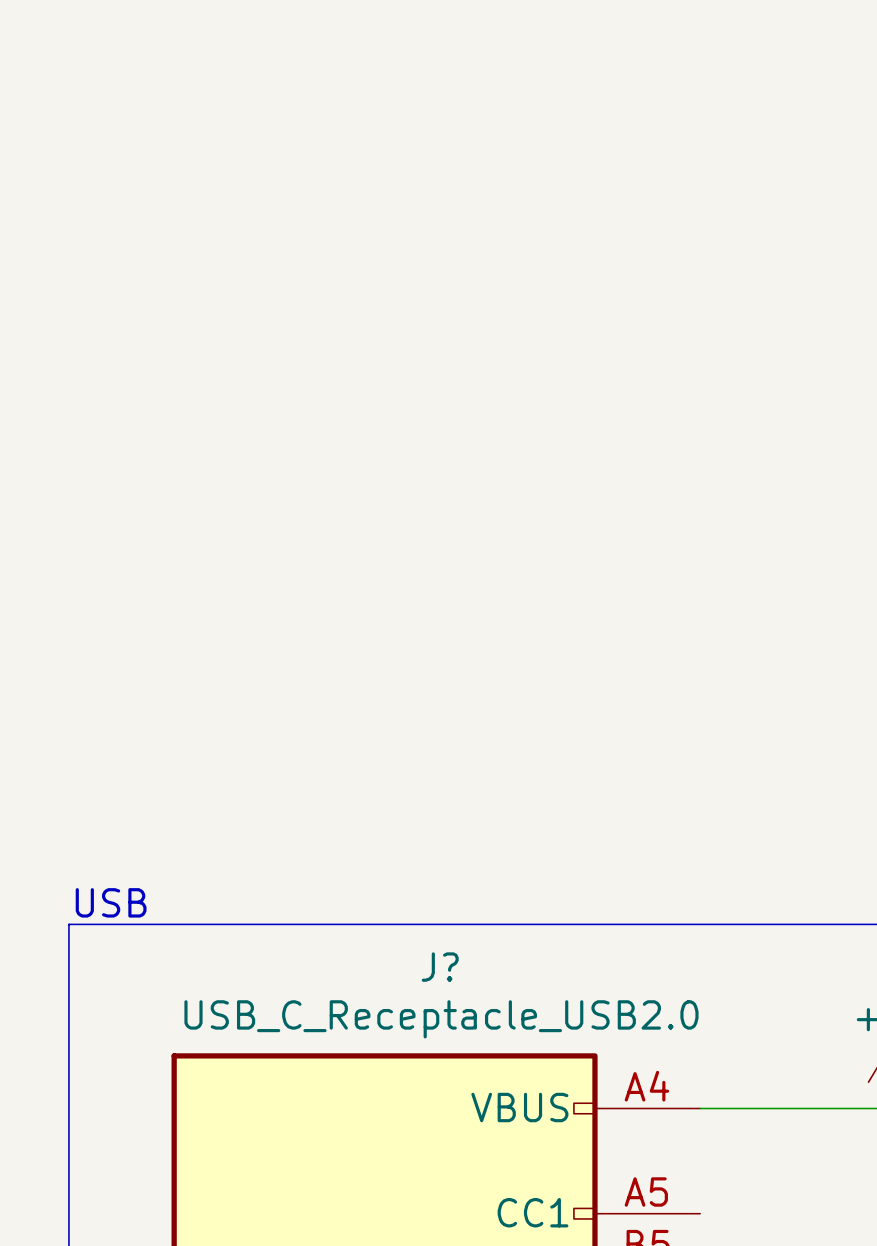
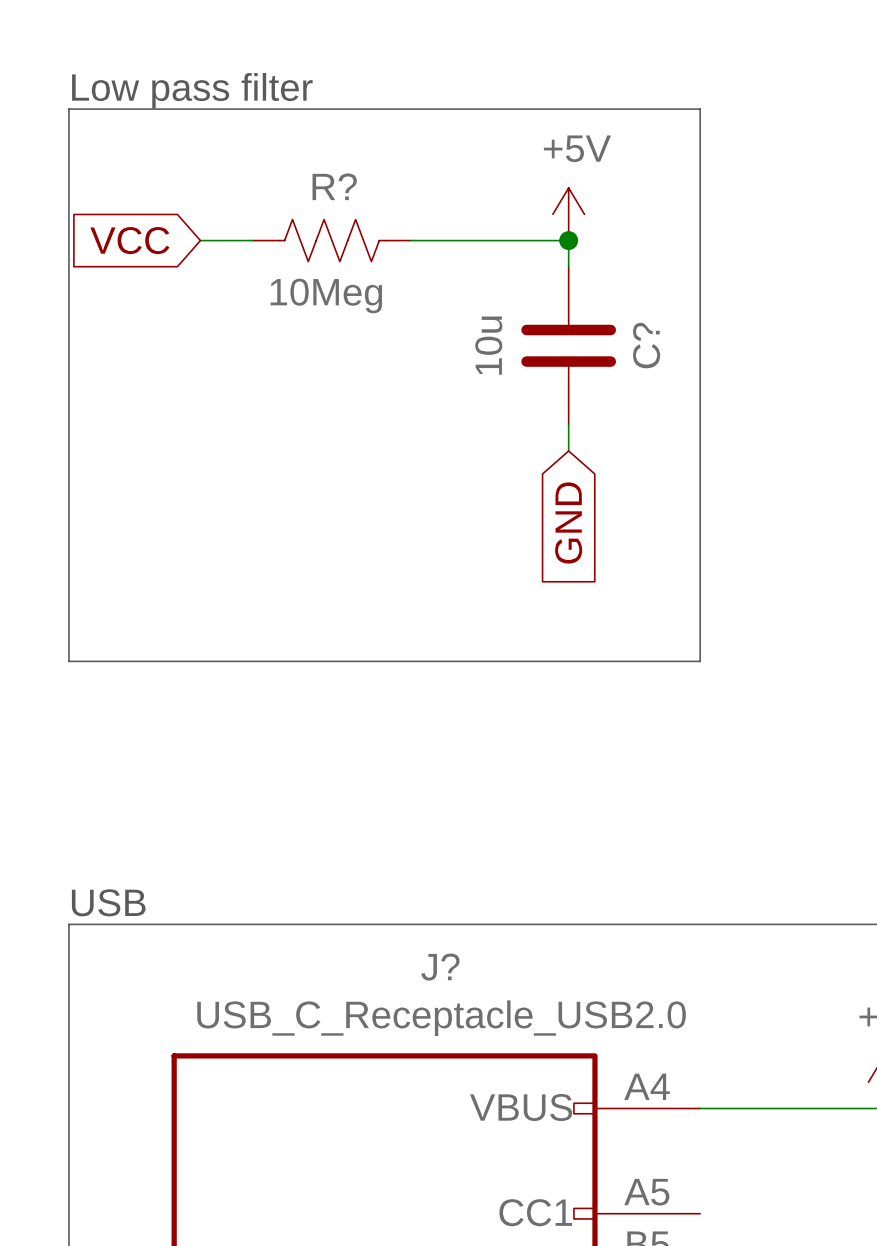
text: none -> Low pass filter (192, 90)
line: none -> (68, 109) (700, 109) (700, 661) (68, 661) (68, 109)
power symbol: none -> +5V (568, 214)
global label: none -> VCC (129, 240)
wire: none -> (200, 240) (253, 240)
R?: none -> 10Meg (331, 240)
wire: none -> (410, 240) (568, 240) (568, 266)
junction: none -> (568, 240)
C?: none -> 10u (568, 345)
wire: none -> (568, 424) (568, 450)
global label: none -> GND (568, 523)

